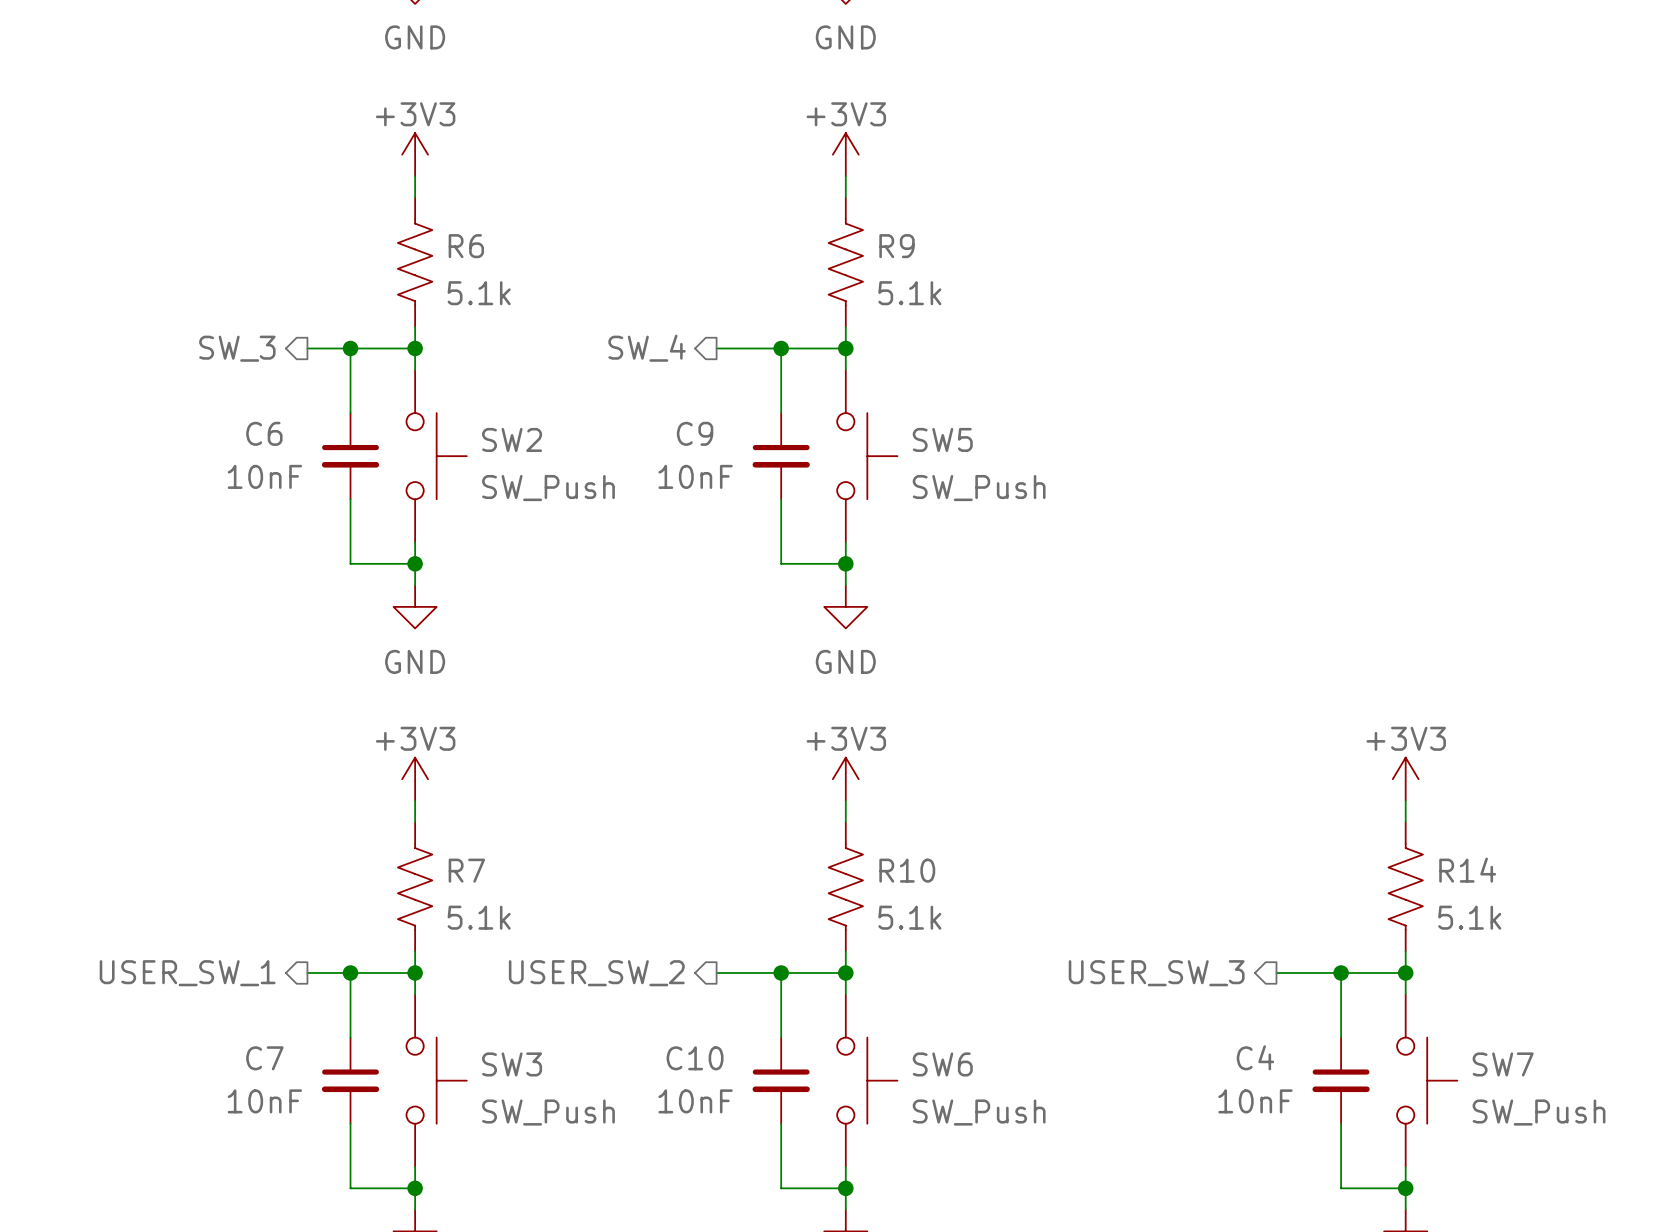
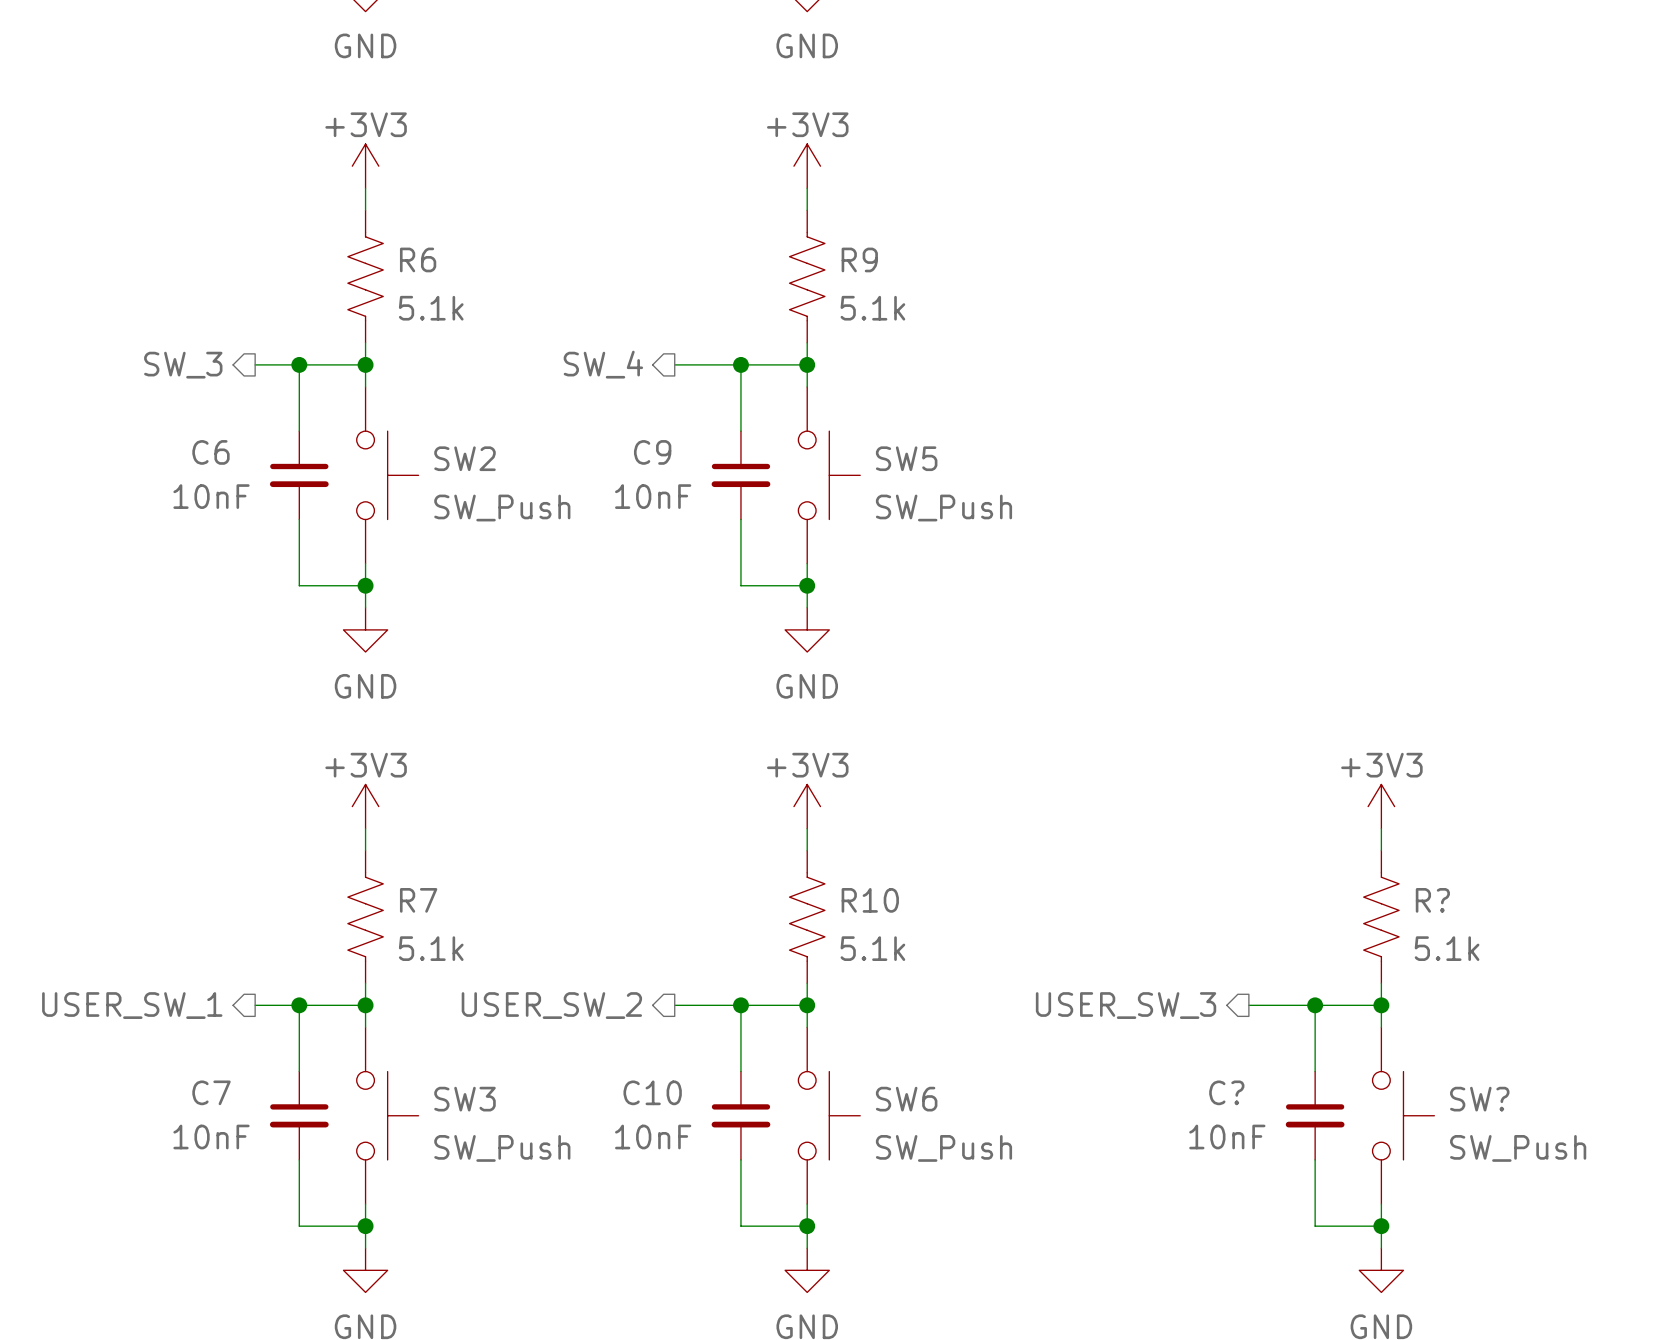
R14 name: R14 (1467, 870) -> R? (1432, 900)
C4 name: C4 (1255, 1057) -> C? (1226, 1092)
SW7 name: SW7 (1503, 1064) -> SW? (1479, 1099)

